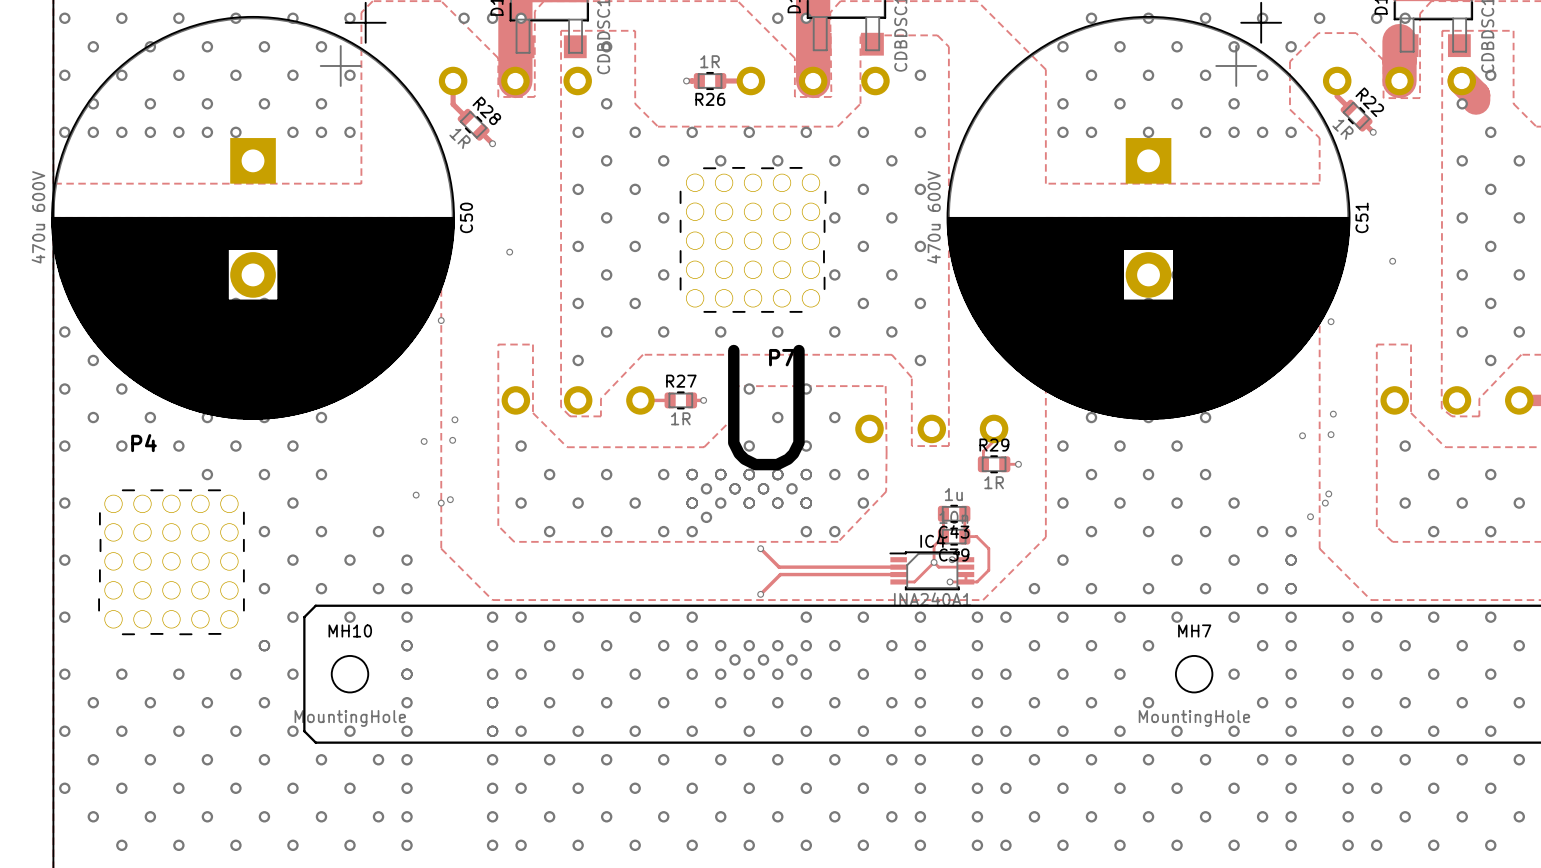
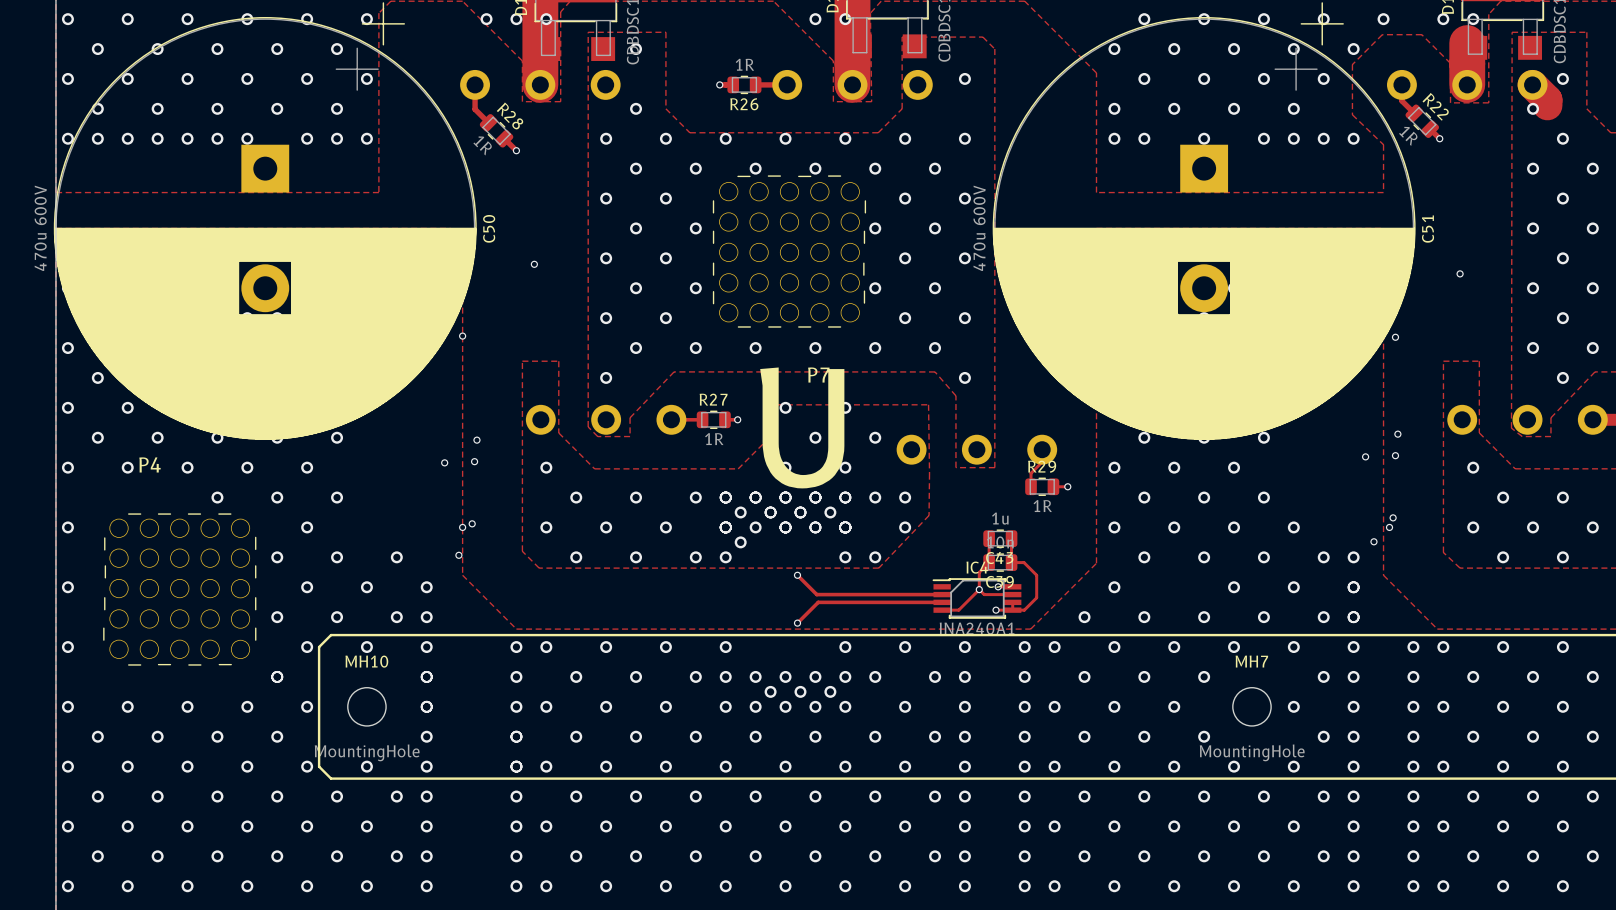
via position: (416, 495) -> (458, 555)
via: none -> (67, 886)

